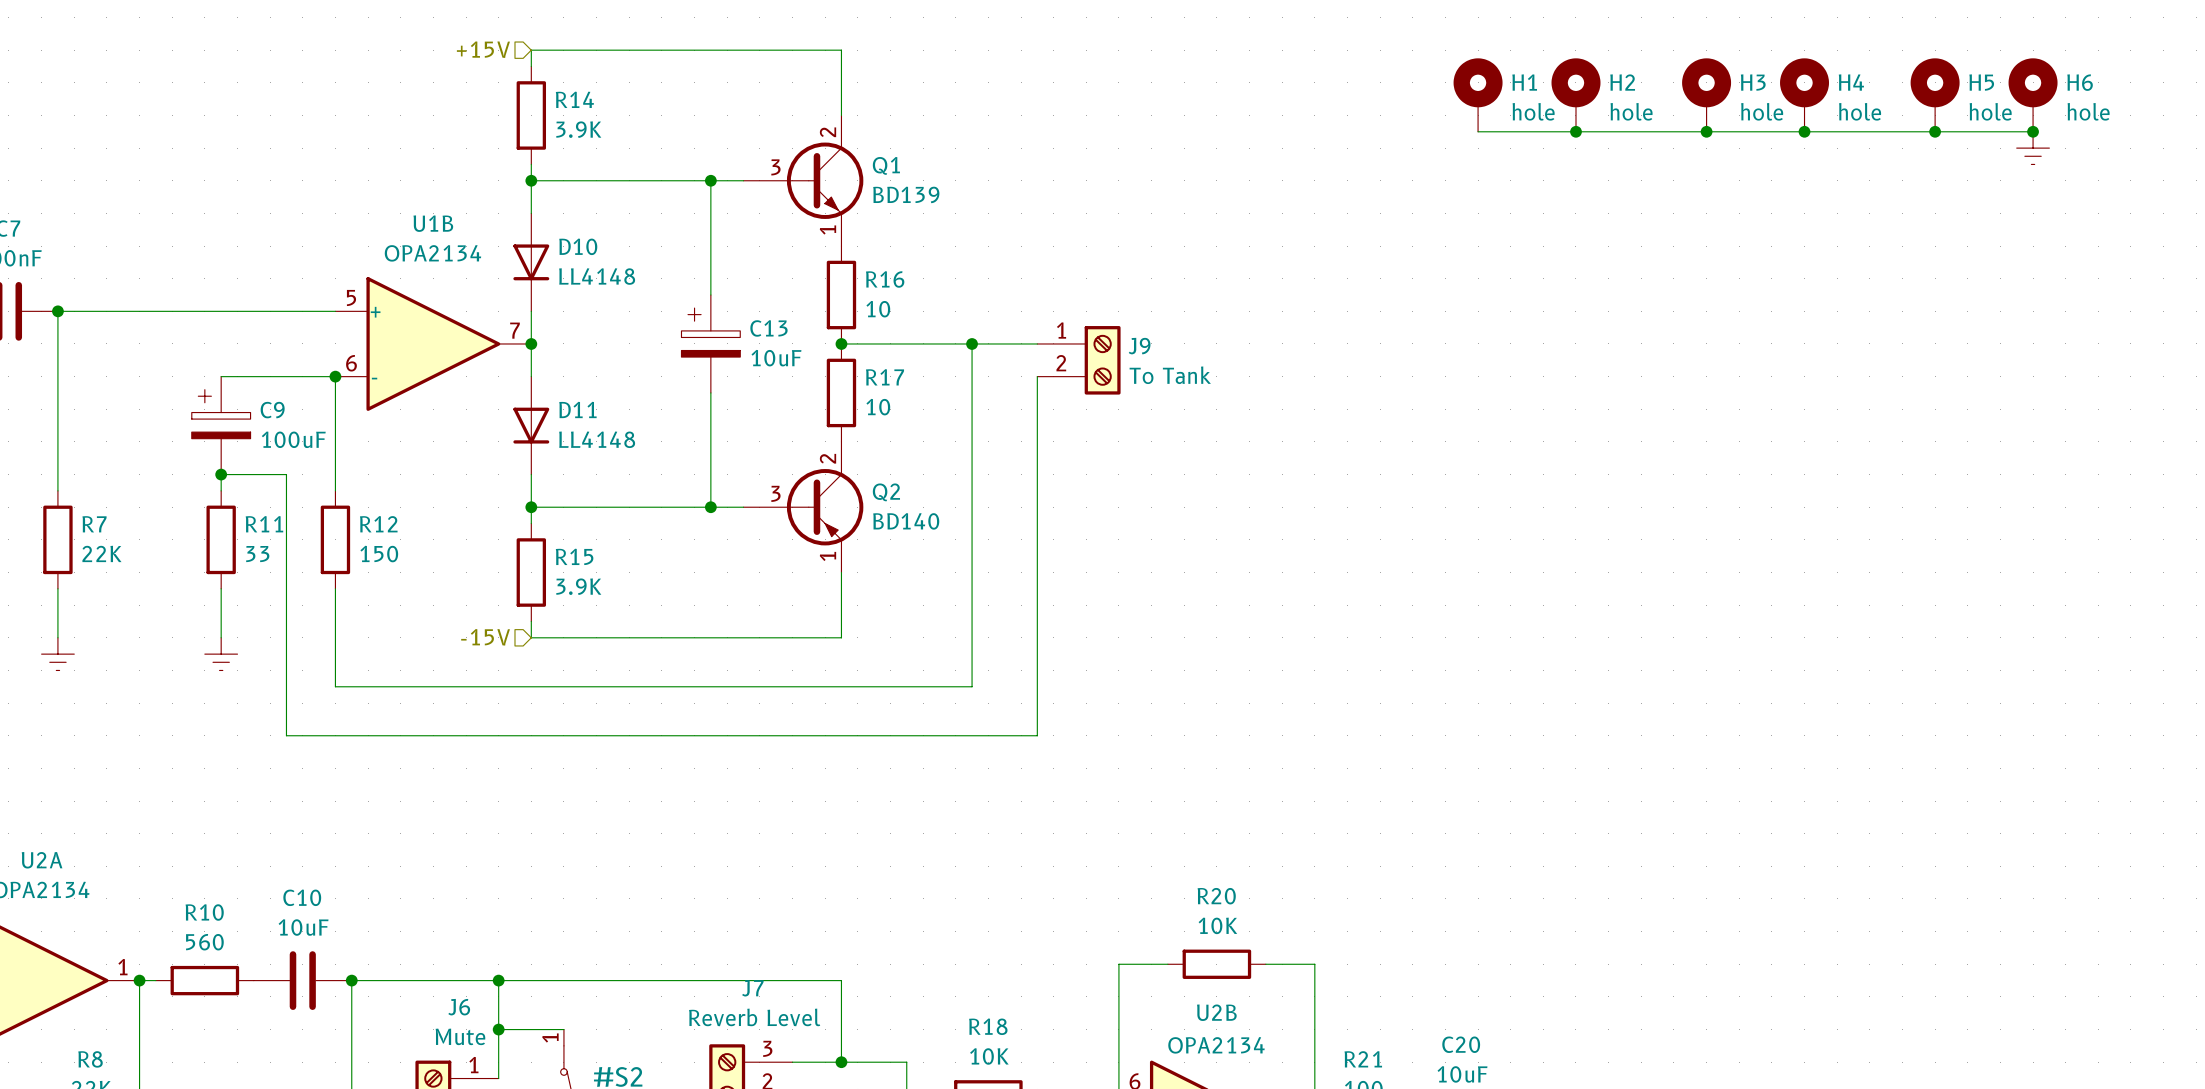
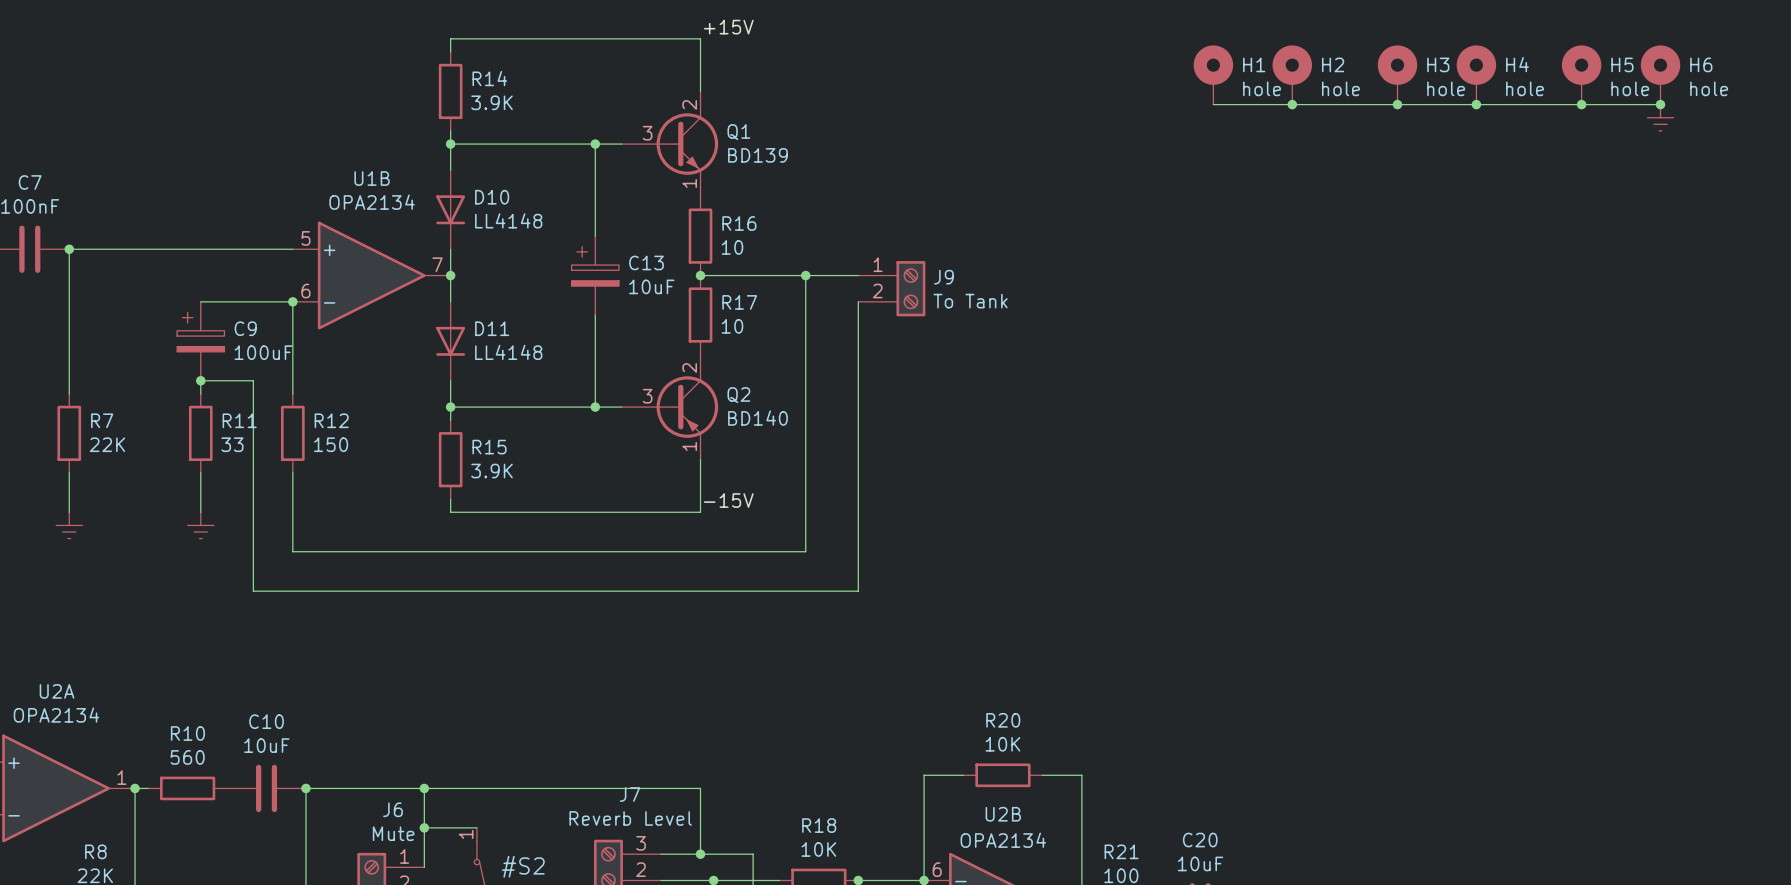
label: none -> +15V (728, 27)
hierarchical label: +15V (483, 49) -> none
label: none -> -15V (728, 500)
hierarchical label: -15V (485, 637) -> none

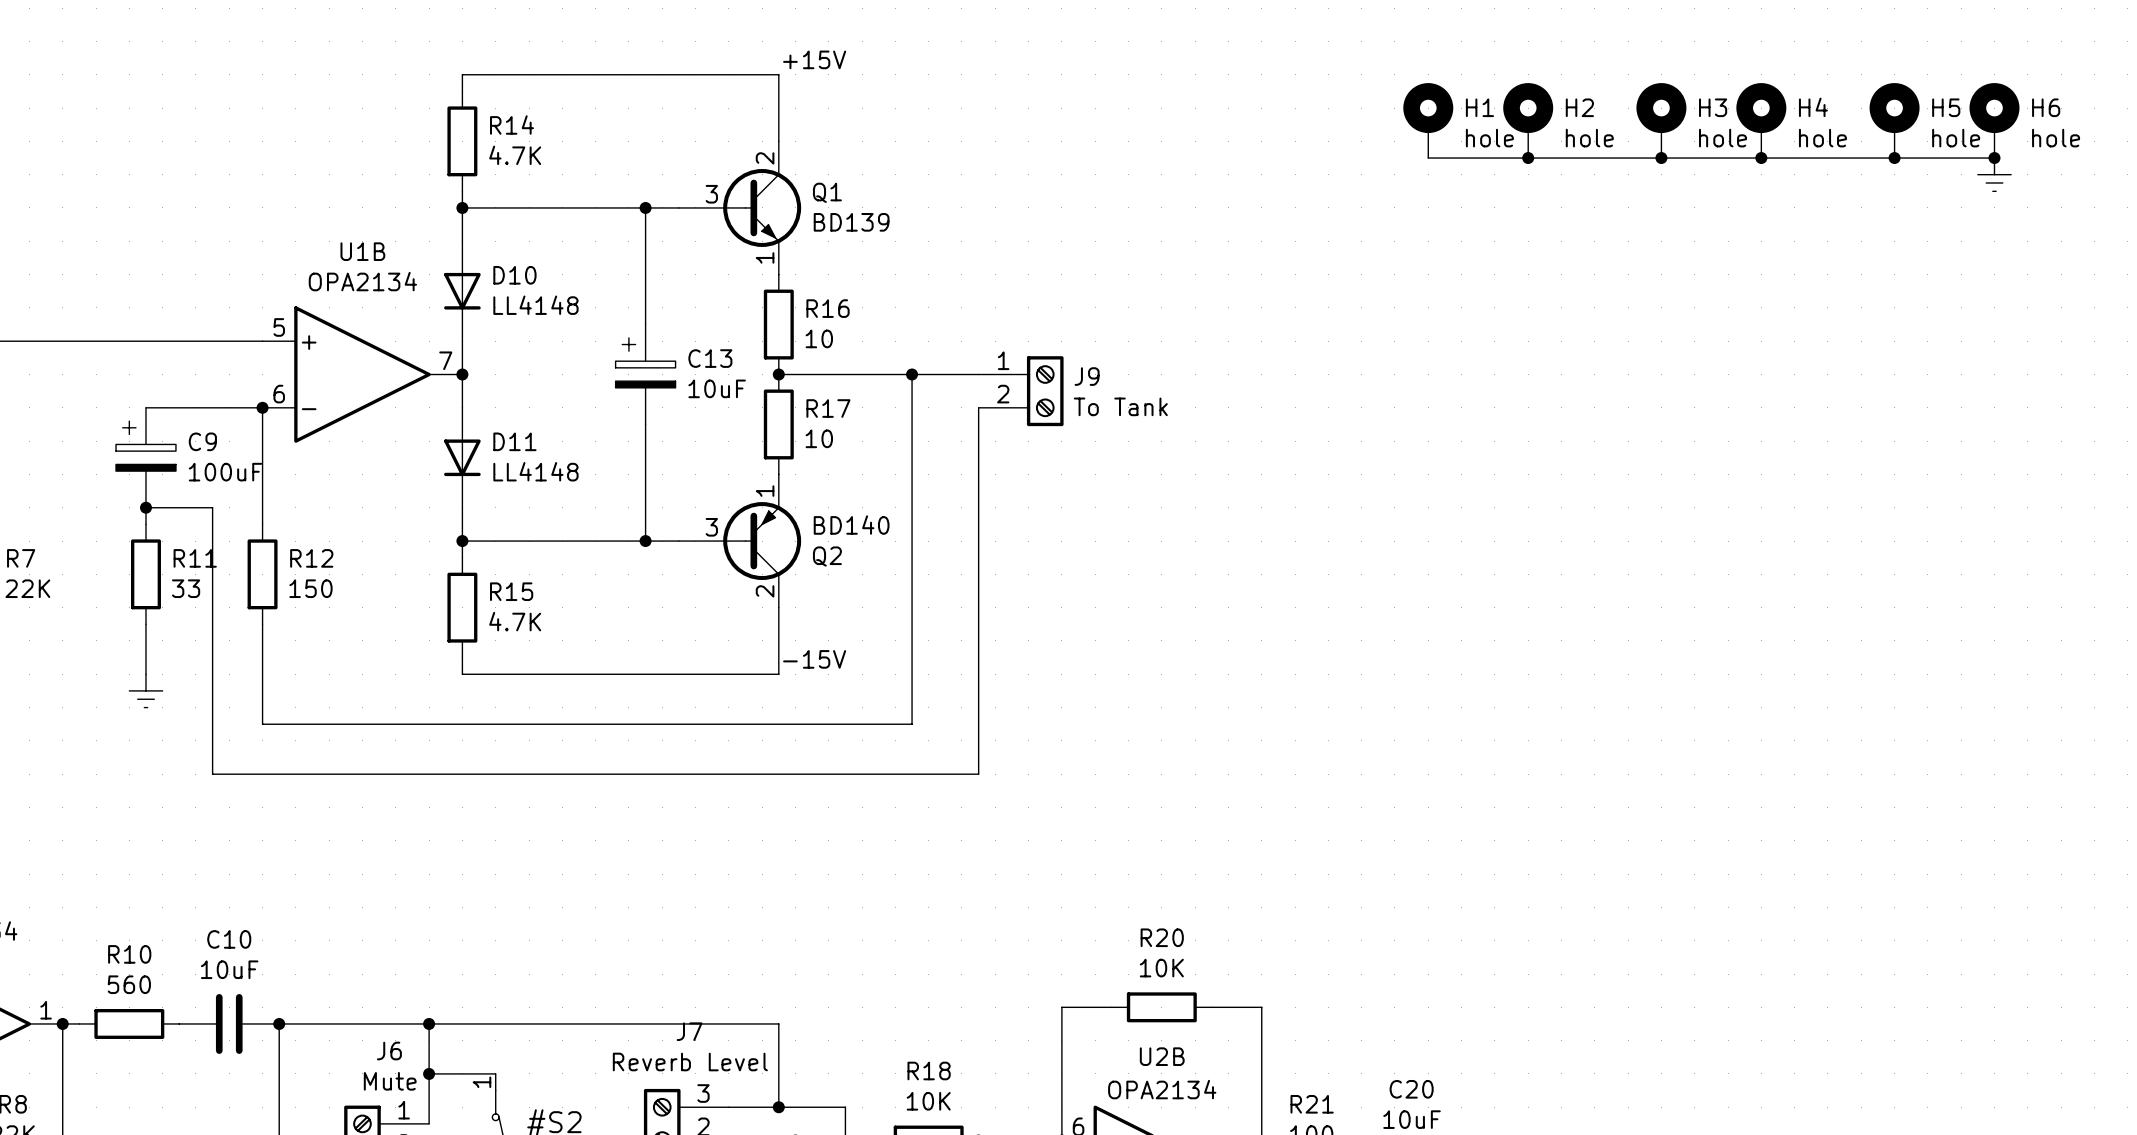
R14 value: 3.9K (492, 102) -> 4.7K (515, 155)
Q2 flip: as is (687, 407) -> up-down (762, 541)
R15 value: 3.9K (492, 471) -> 4.7K (515, 621)

